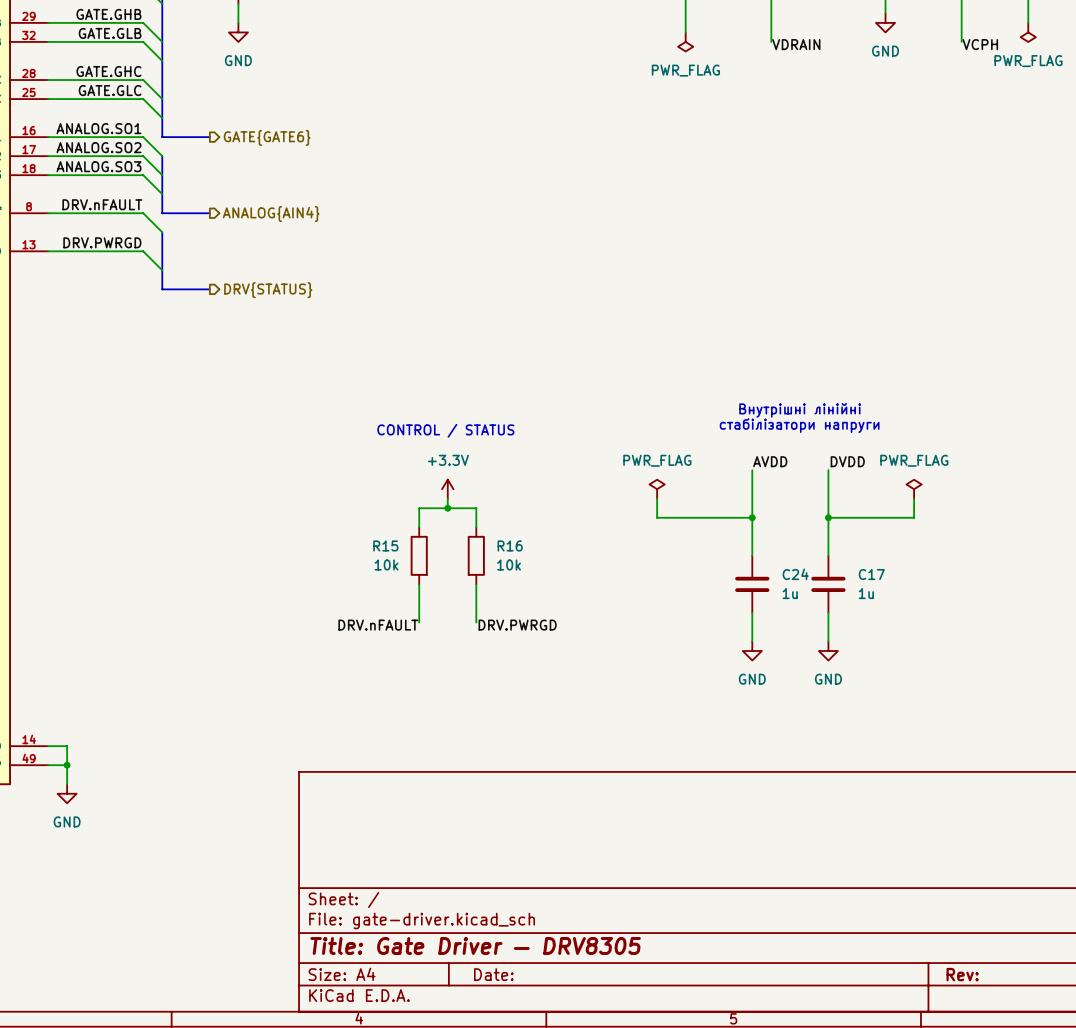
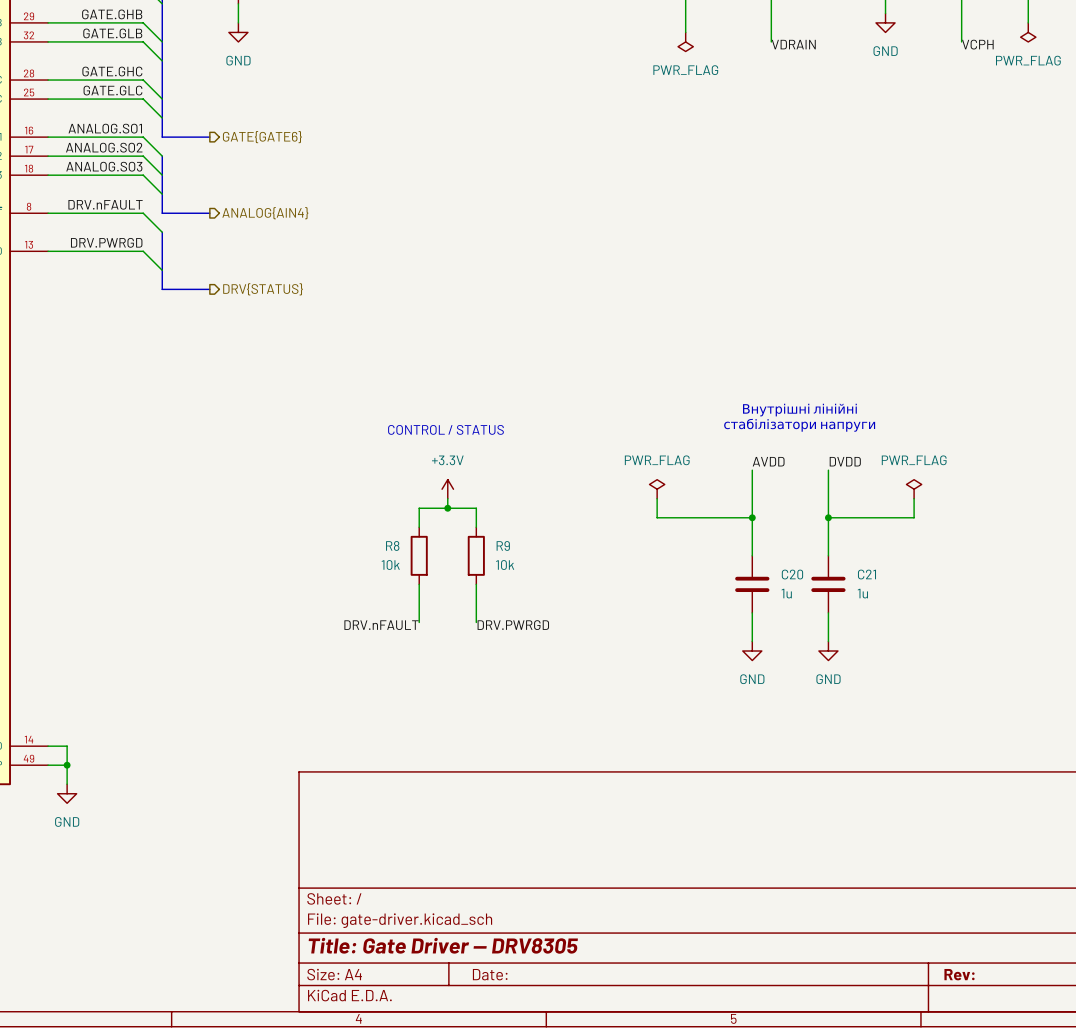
R15 name: R15 (385, 545) -> R8 (392, 545)
R16 name: R16 (510, 545) -> R9 (503, 545)
C24 name: C24 (795, 574) -> C20 (792, 574)
C17 name: C17 (871, 574) -> C21 (866, 574)

